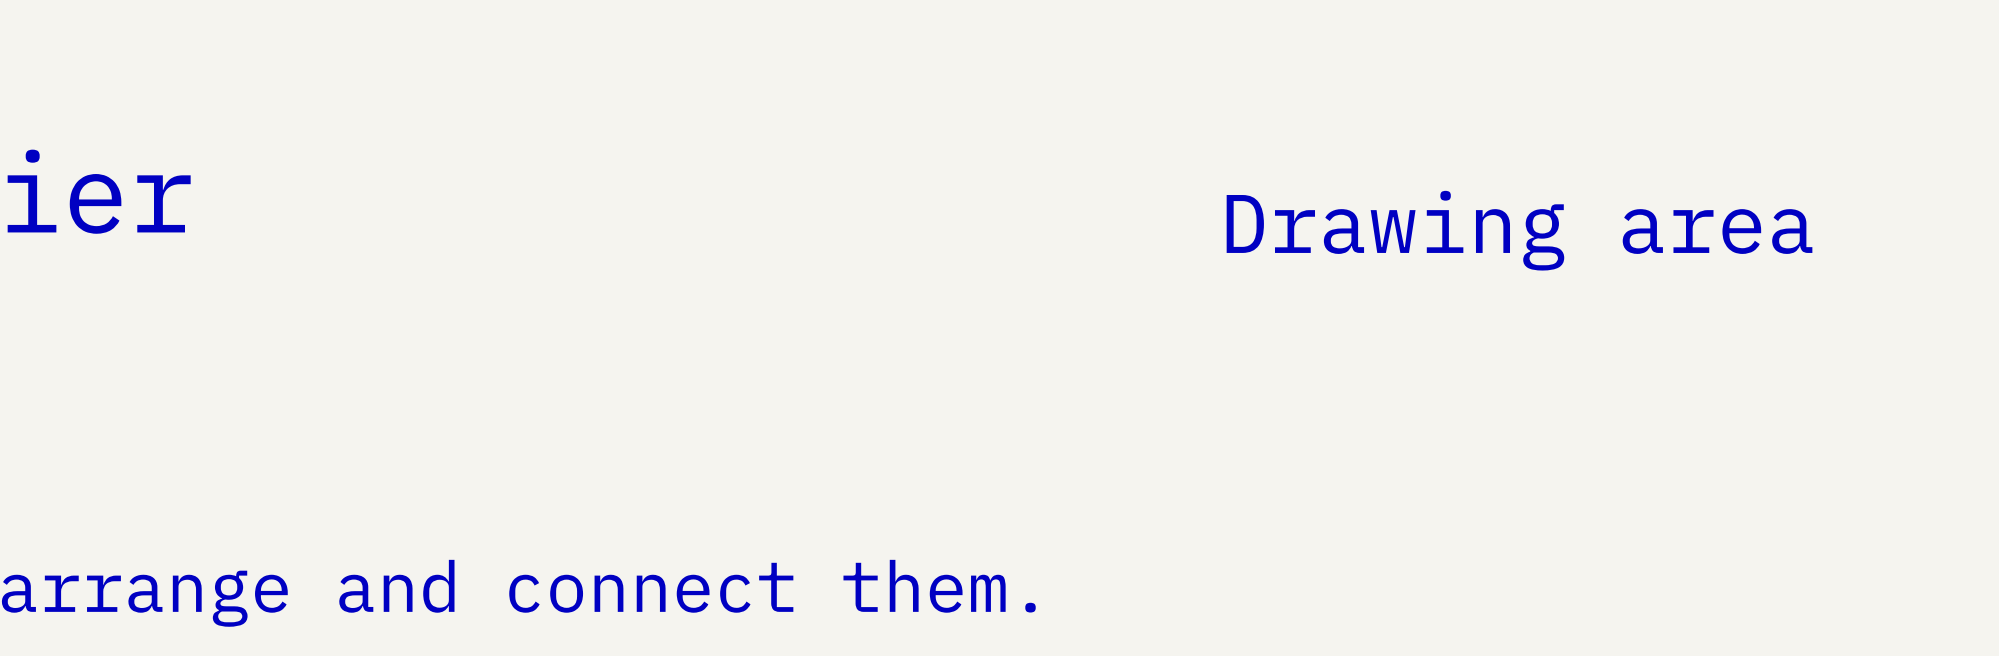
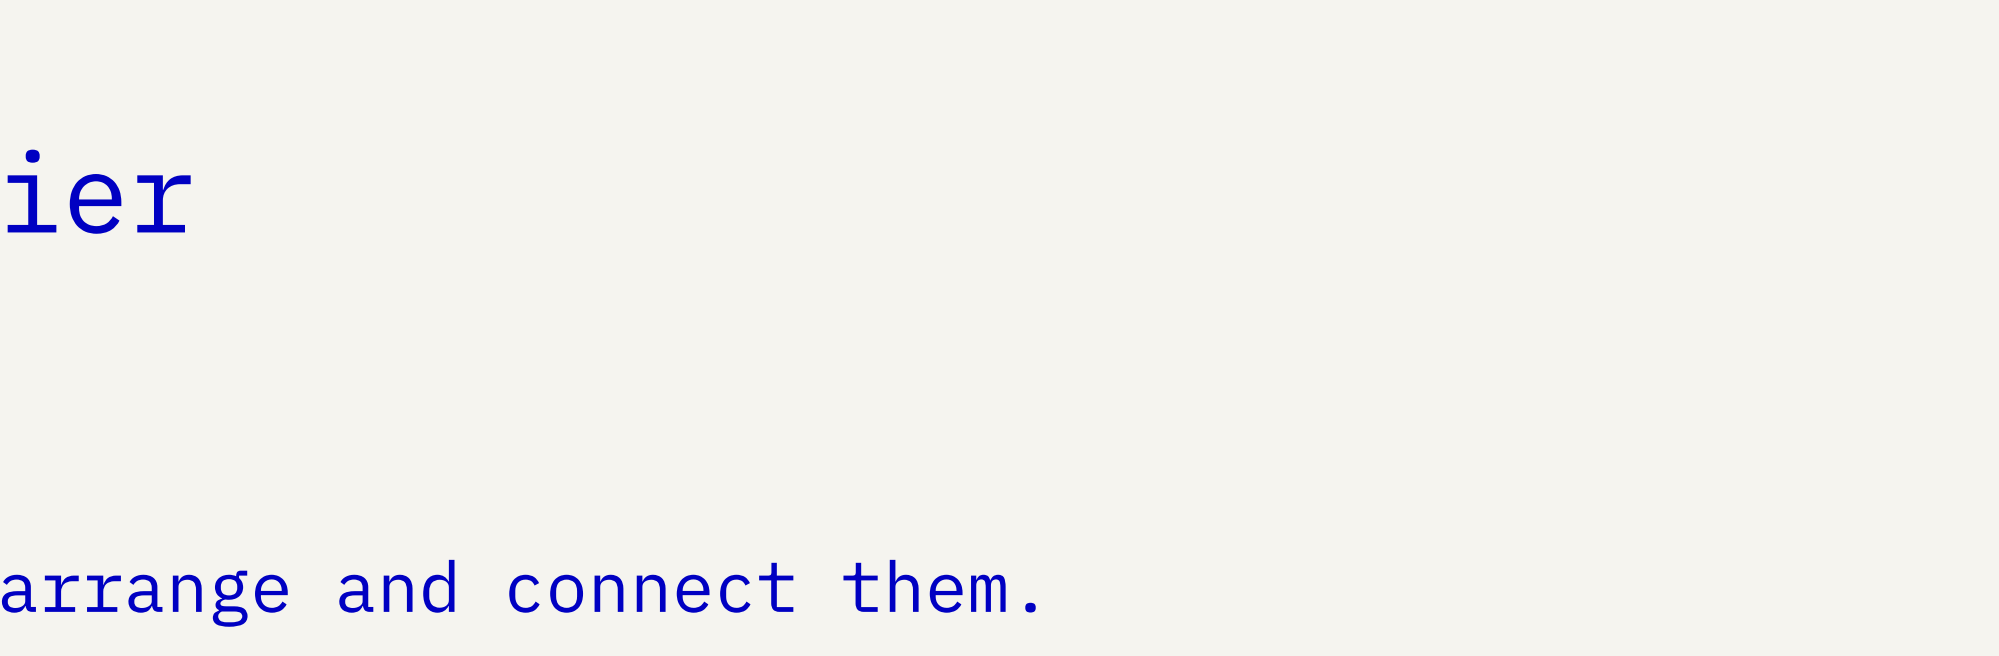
text: Drawing area (1519, 230) -> none

